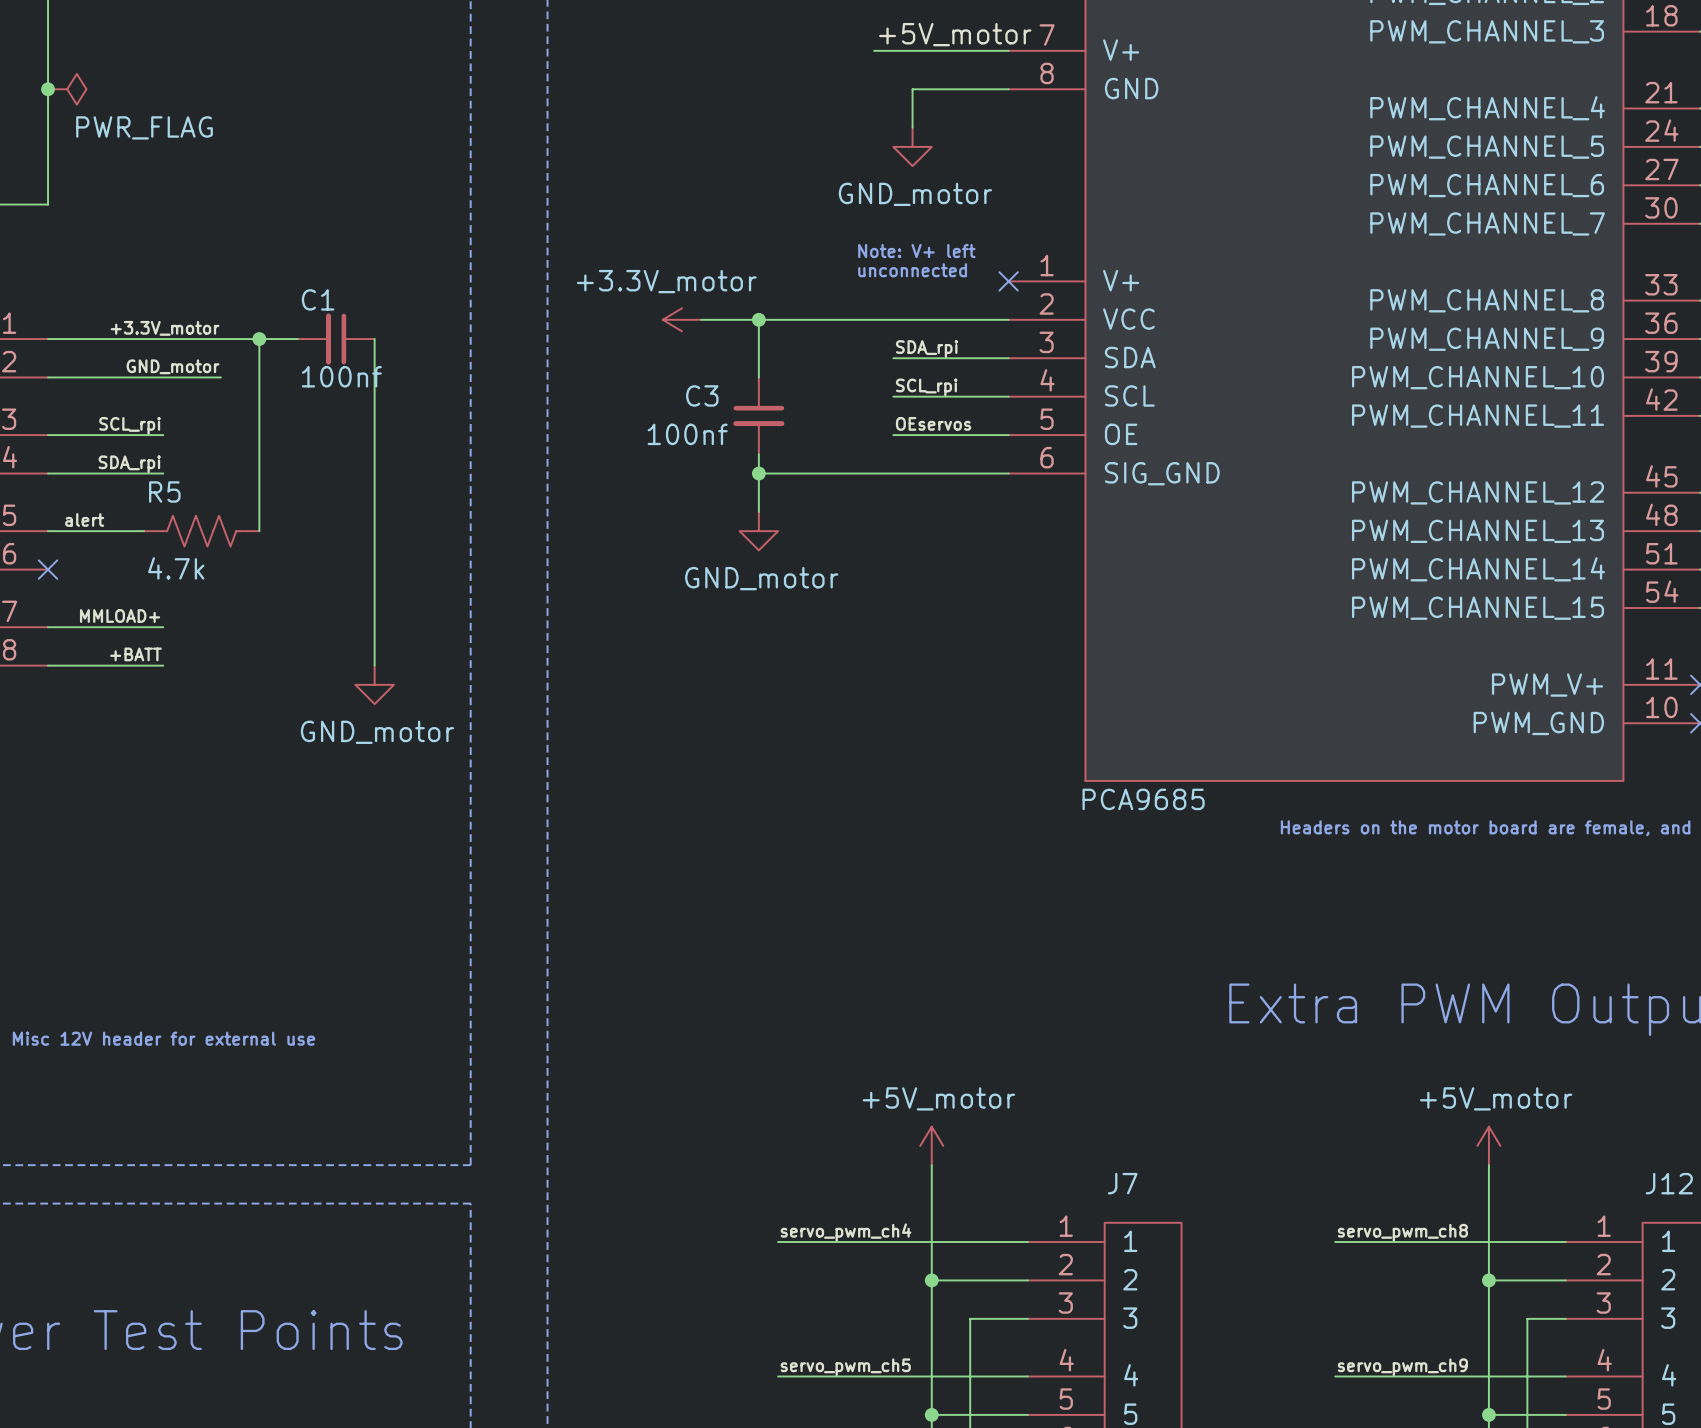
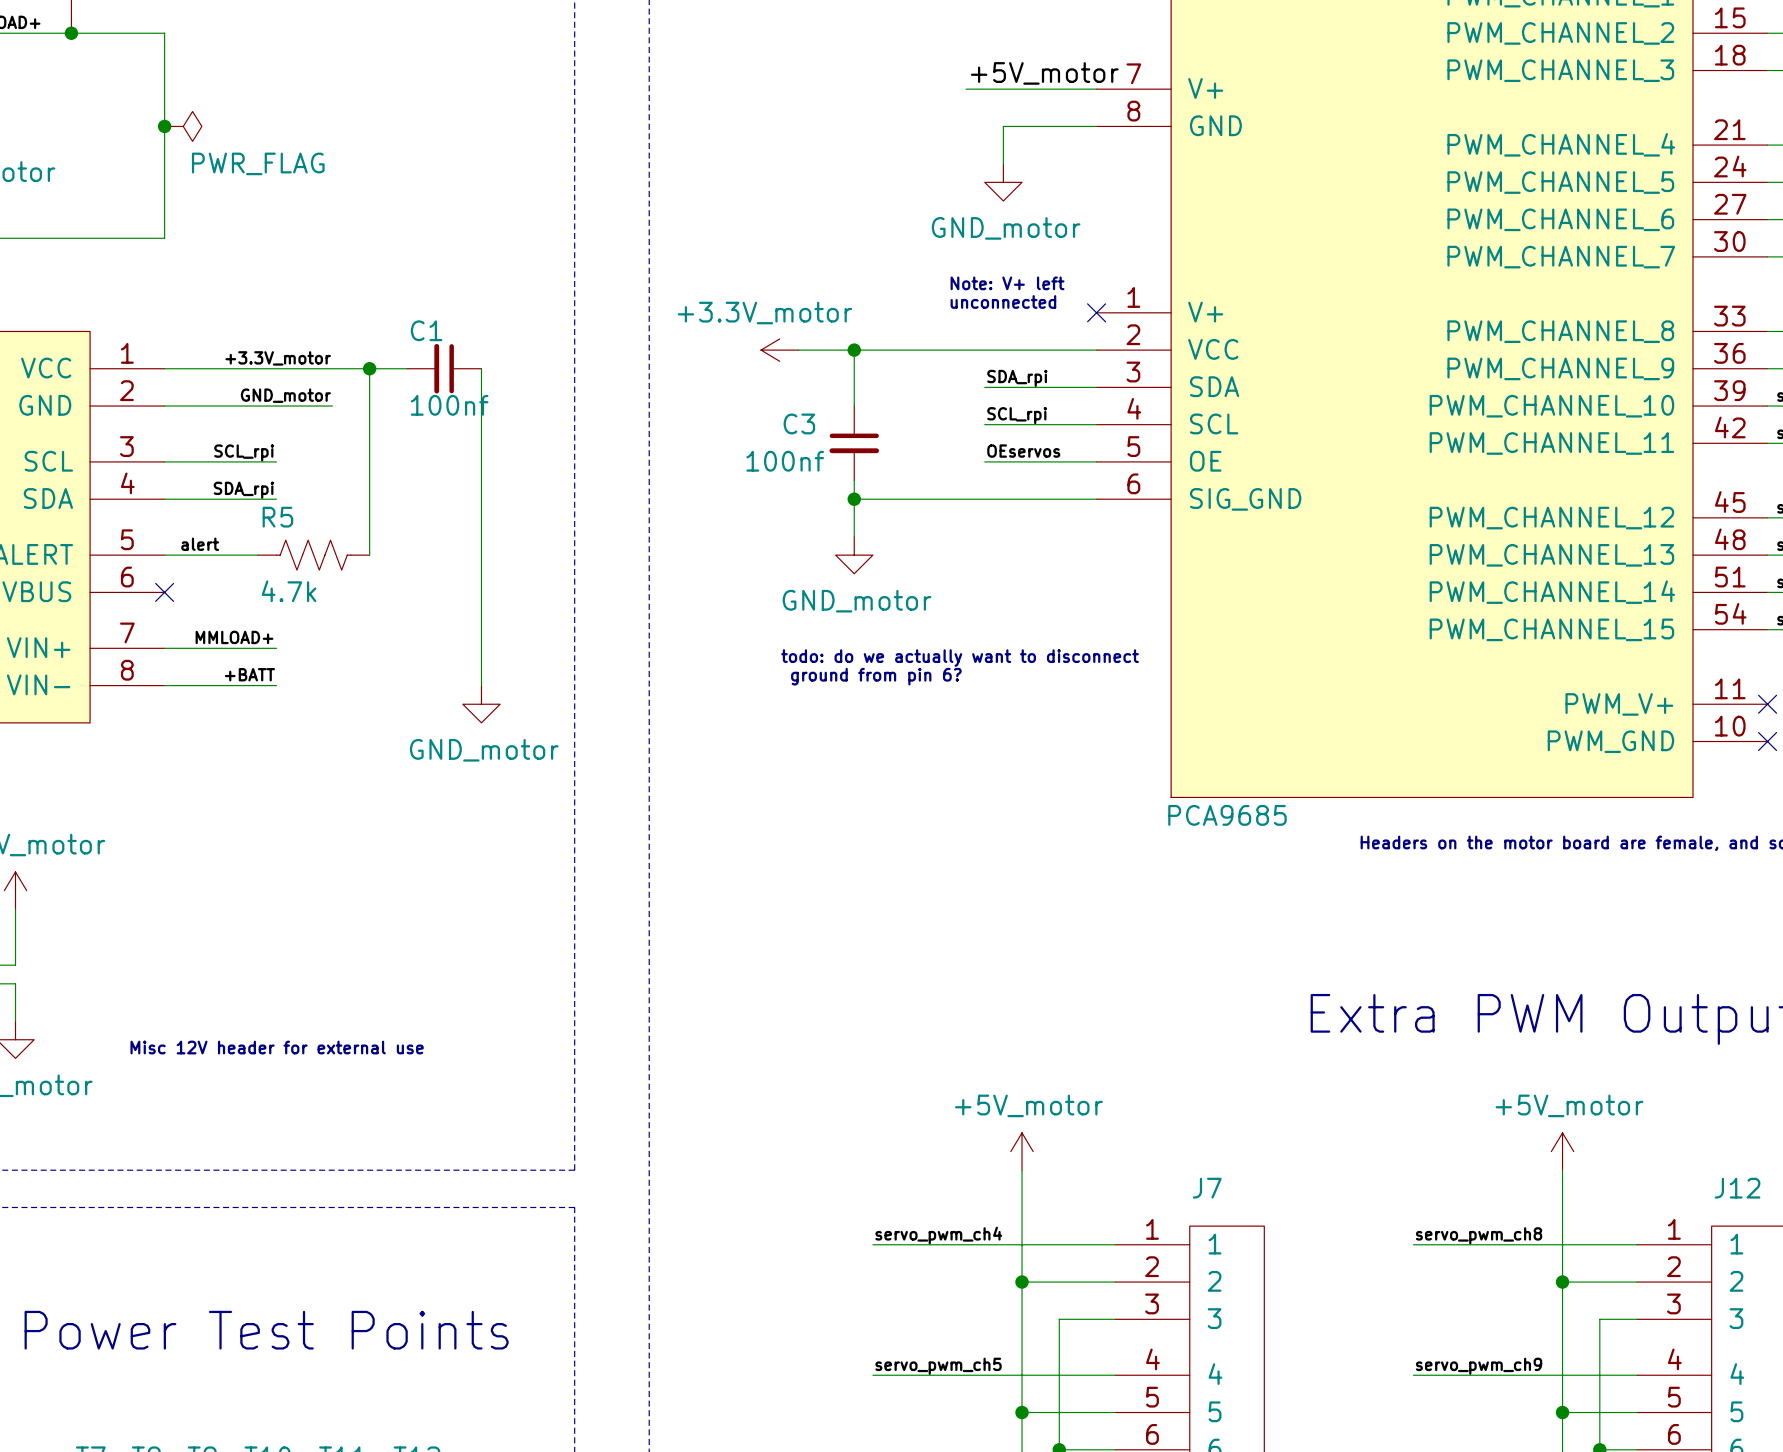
text: none -> todo: do we actually want to disconnect (960, 658)
text: none -> ground from pin 6? (876, 676)

